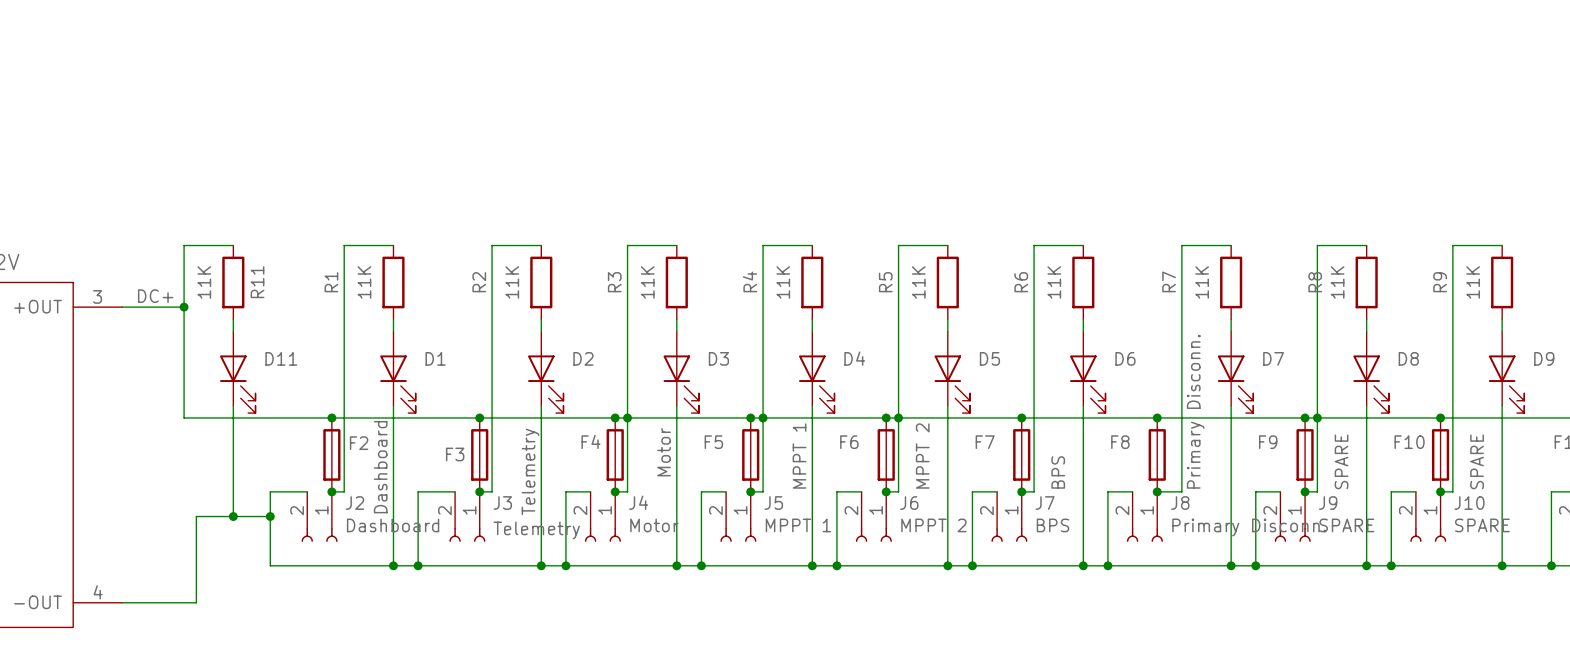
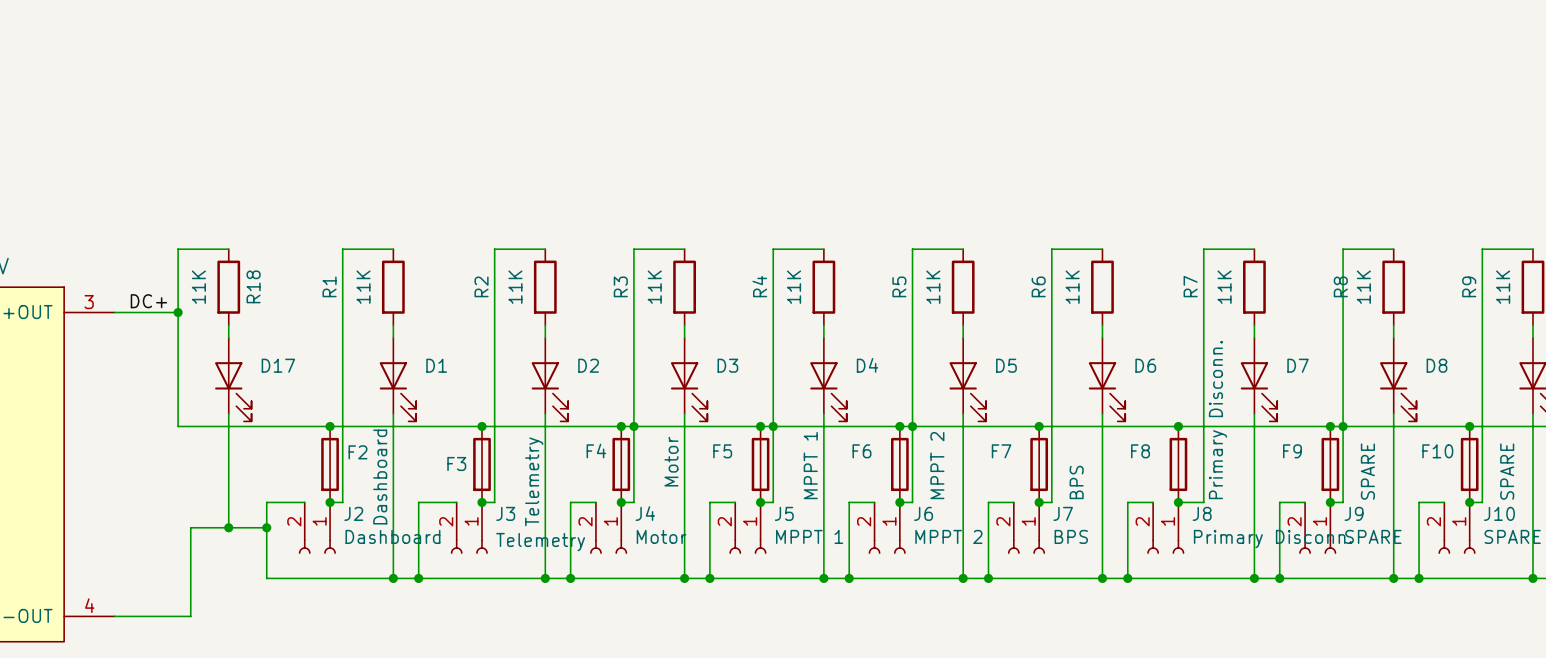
R11 name: R11 (257, 282) -> R18 (253, 286)
D11 name: D11 (281, 358) -> D17 (278, 365)

